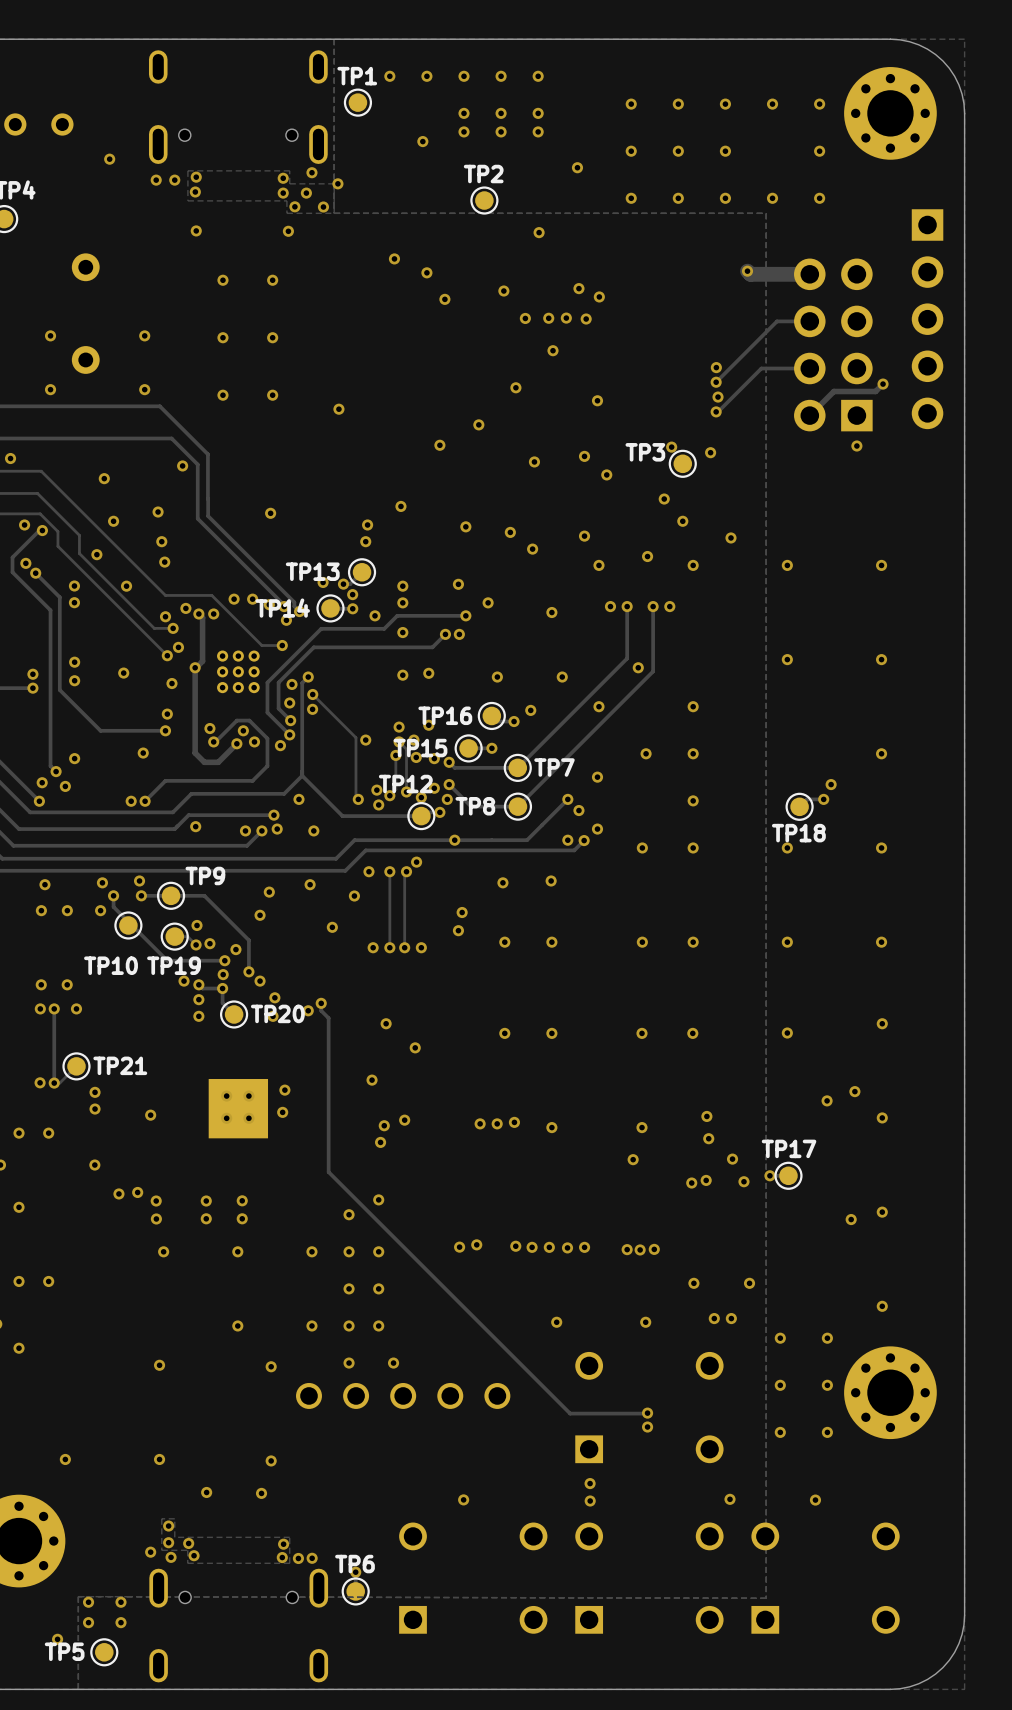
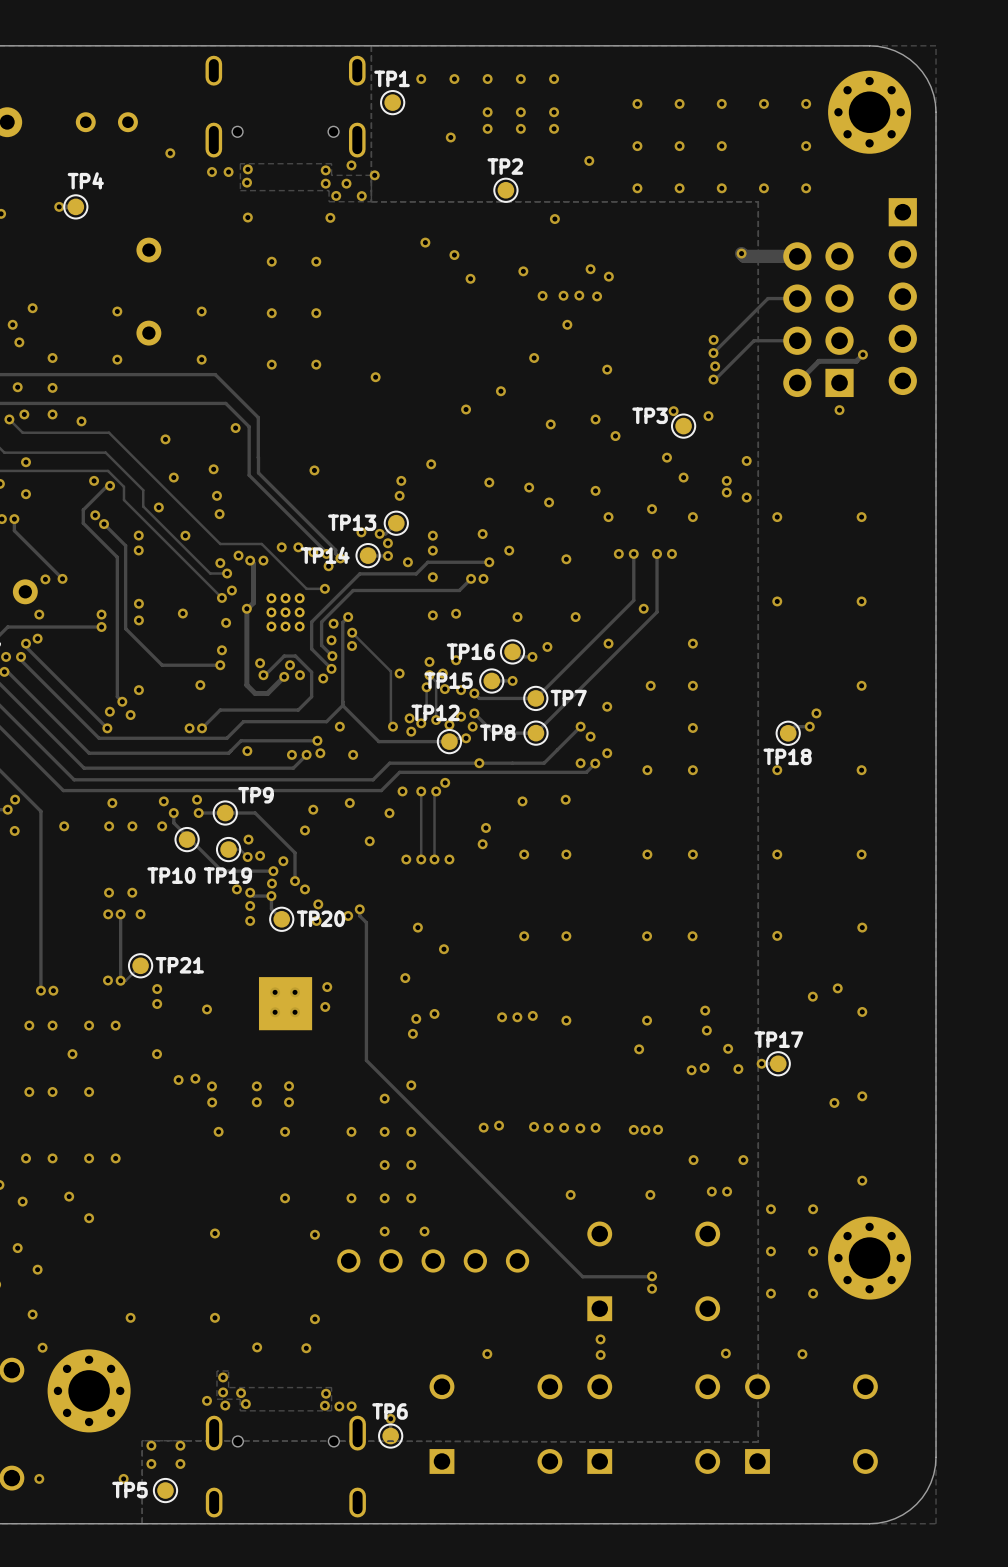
via: none -> (746, 460)
via: none -> (726, 480)
via: none -> (746, 497)

